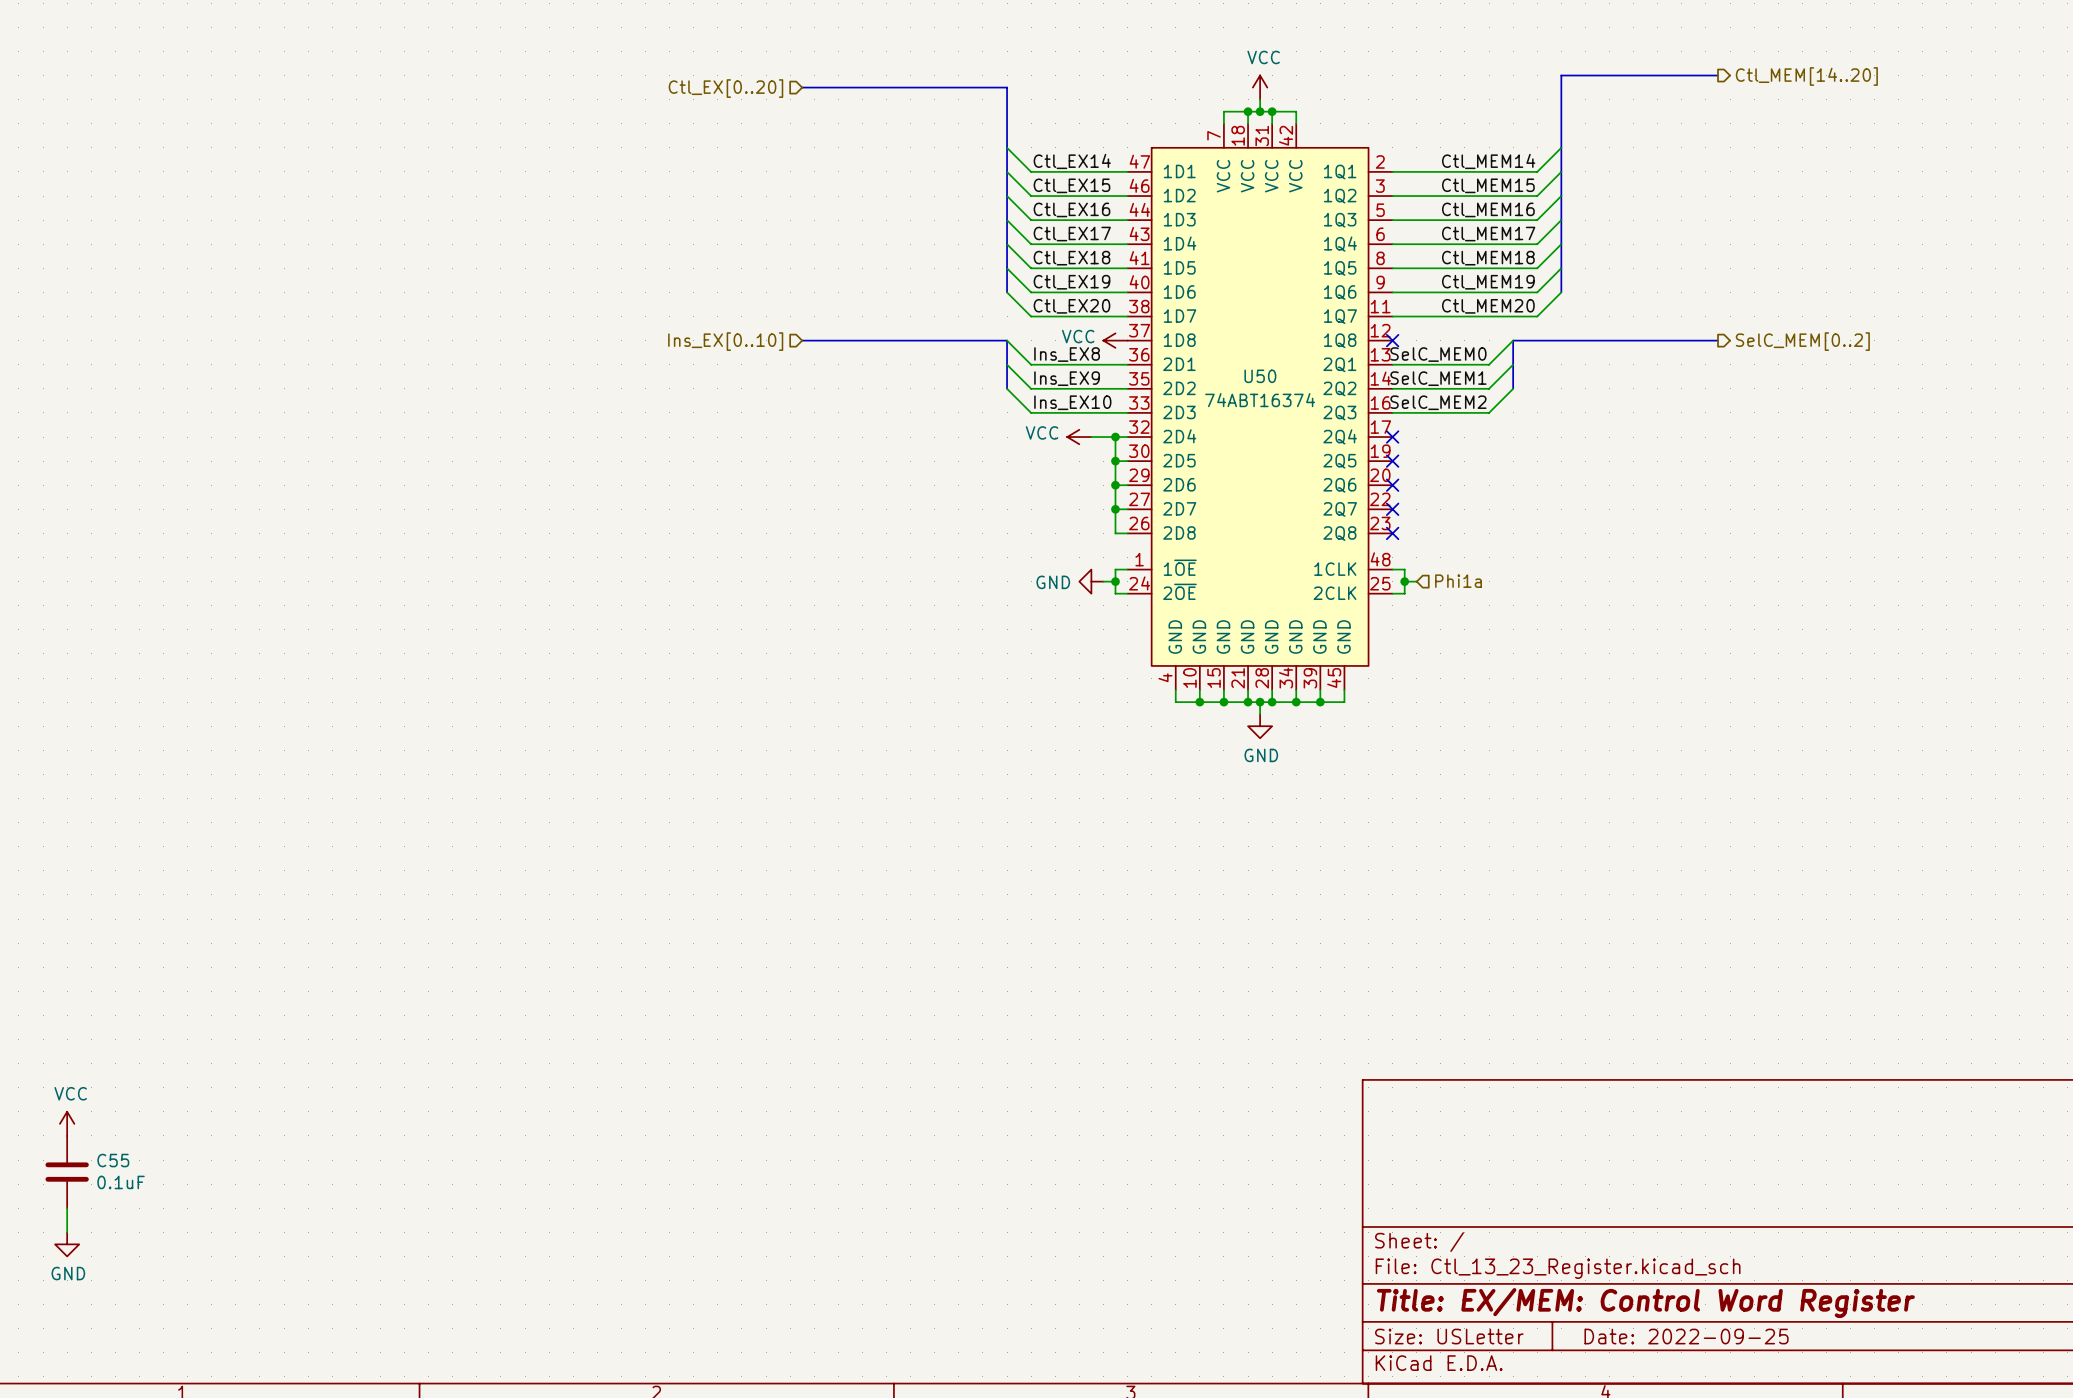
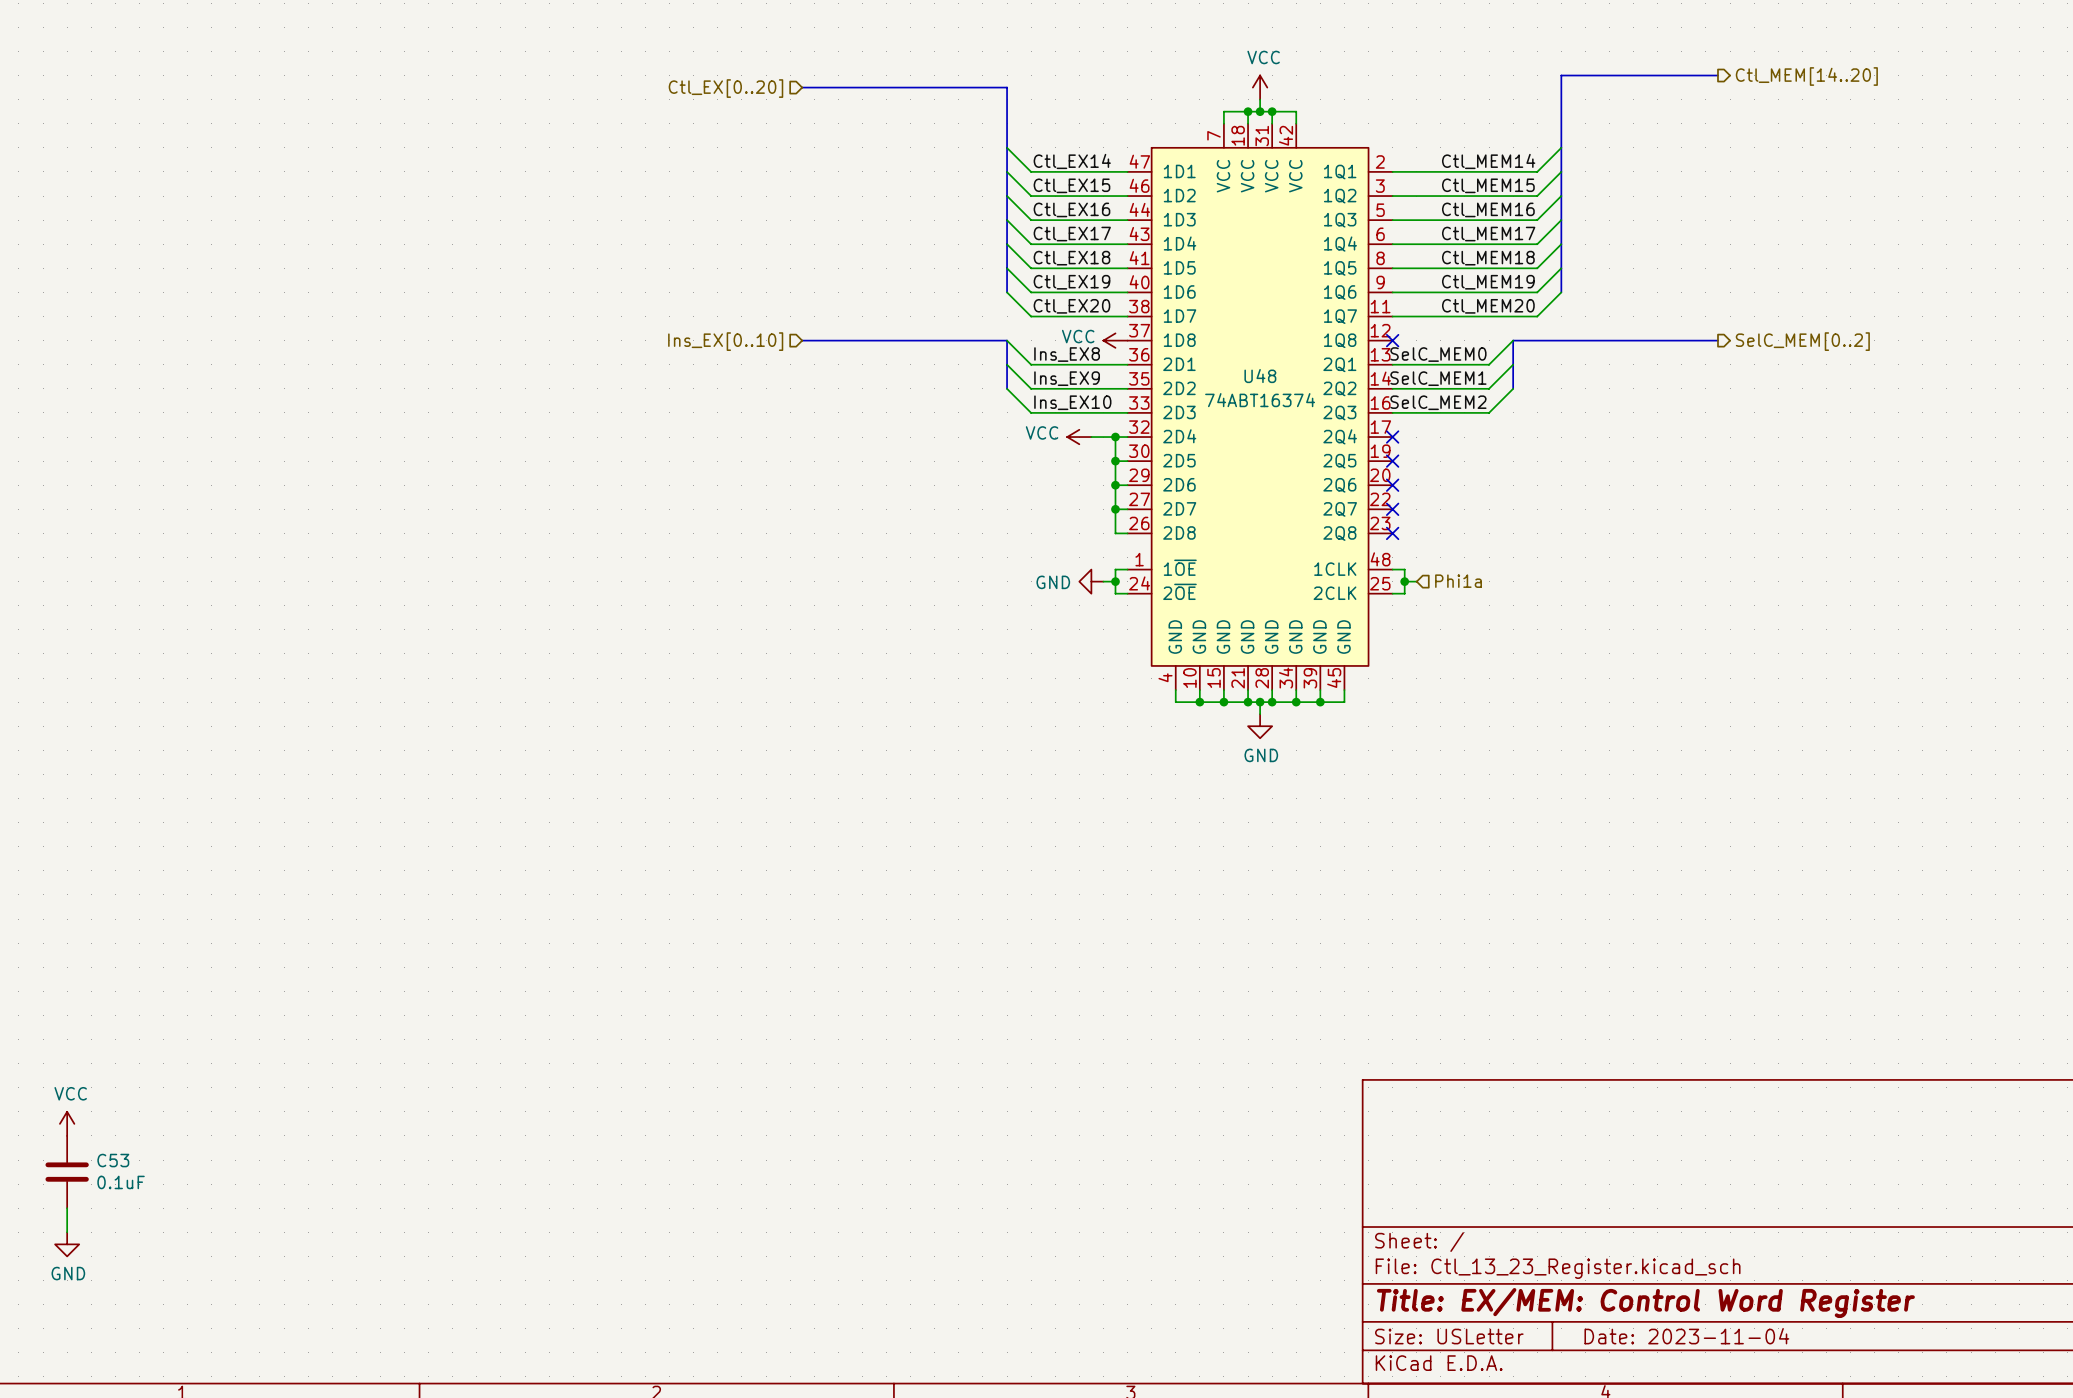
U50 name: U50 (1260, 376) -> U48 (1260, 376)
C55 name: C55 (113, 1160) -> C53 (113, 1160)
title block: Date: 2022-09-25 (1686, 1336) -> Date: 2023-11-04 (1686, 1336)

